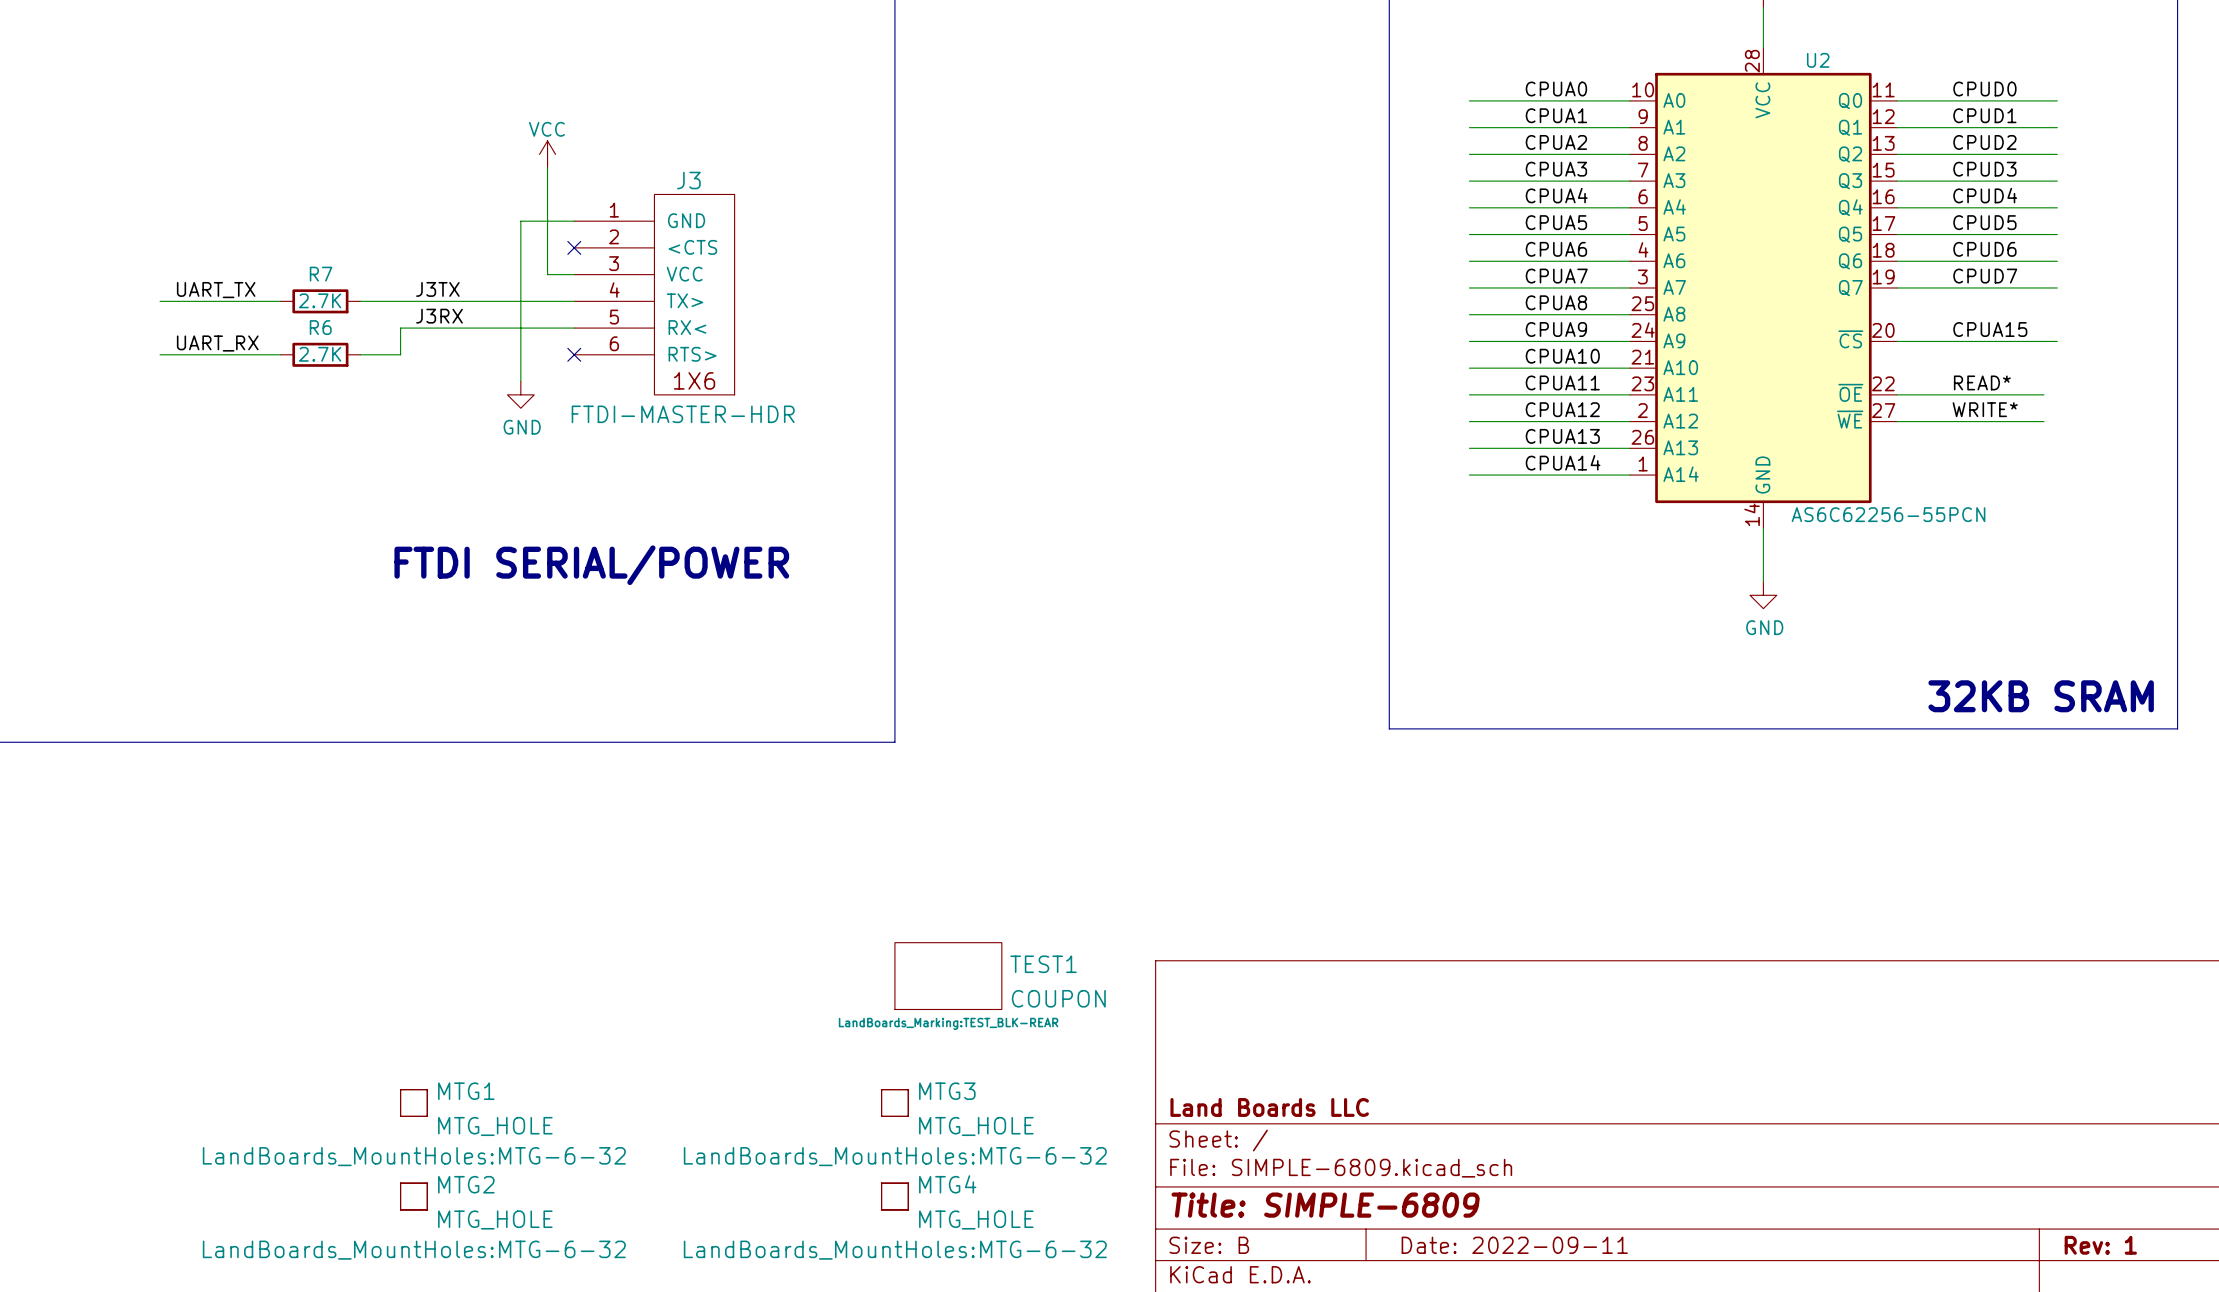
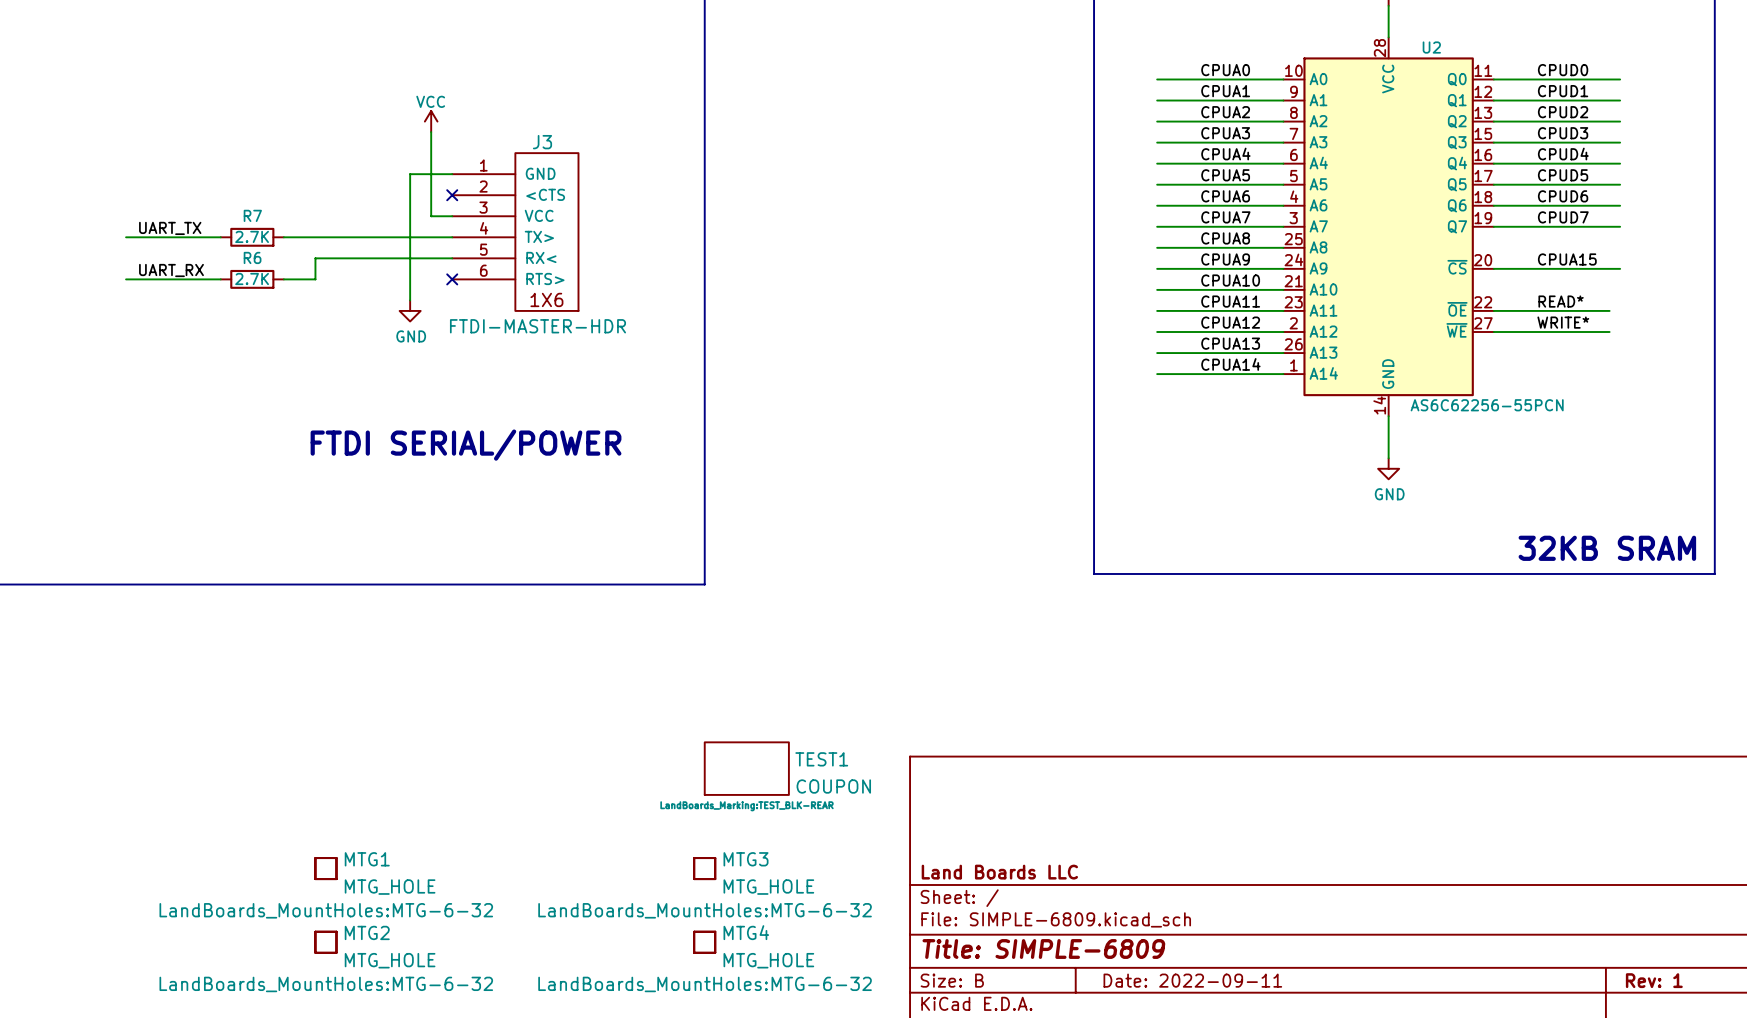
label: J3TX (437, 289) -> none
label: J3RX (439, 316) -> none

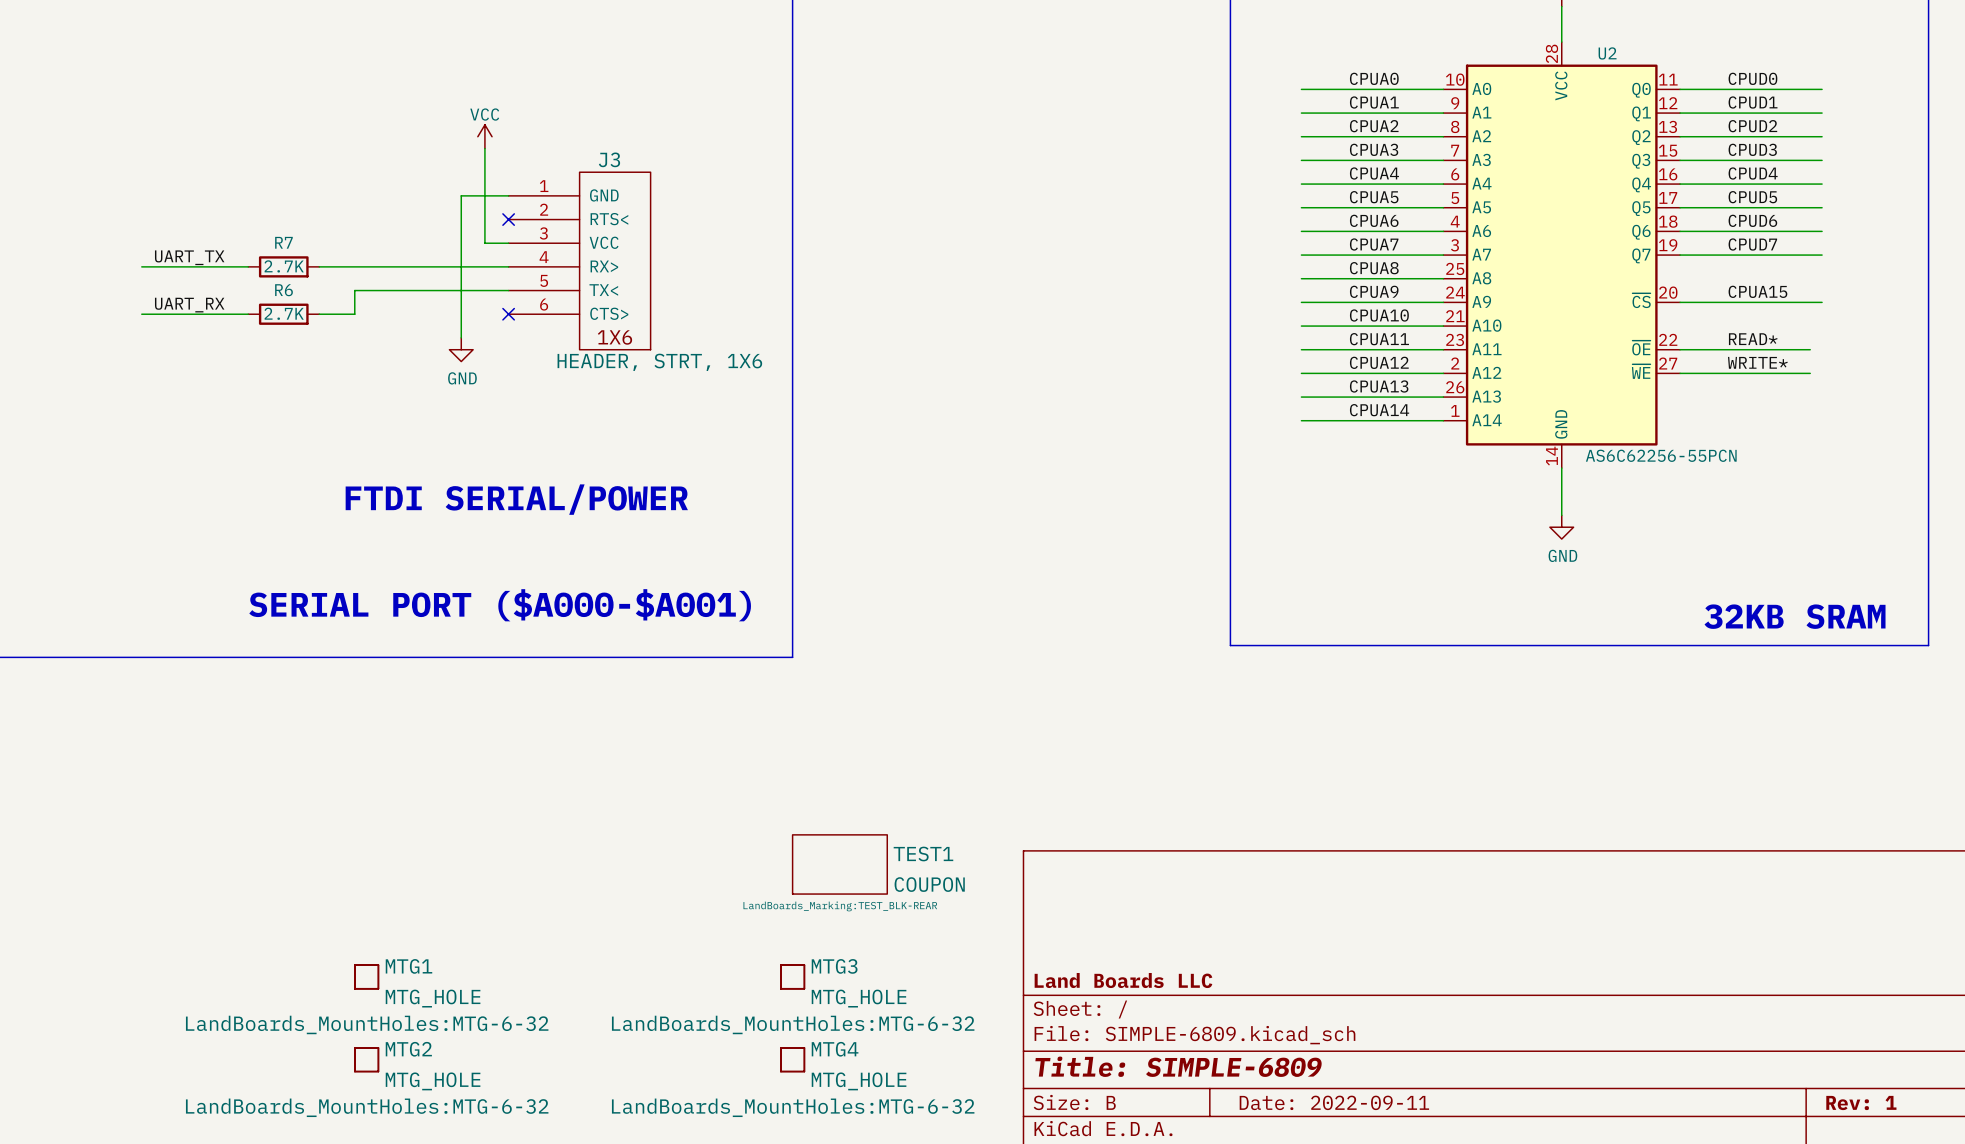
J3 pin name: <CTS (545, 194) -> RTS< (609, 219)
J3 pin name: TX> (539, 236) -> RX> (604, 266)
J3 pin name: RX< (541, 257) -> TX< (603, 290)
J3 pin name: RTS> (545, 279) -> CTS> (609, 313)
J3 value: FTDI-MASTER-HDR (537, 326) -> HEADER, STRT, 1X6 (659, 362)
text: none -> SERIAL PORT ($A000-$A001) (500, 605)

